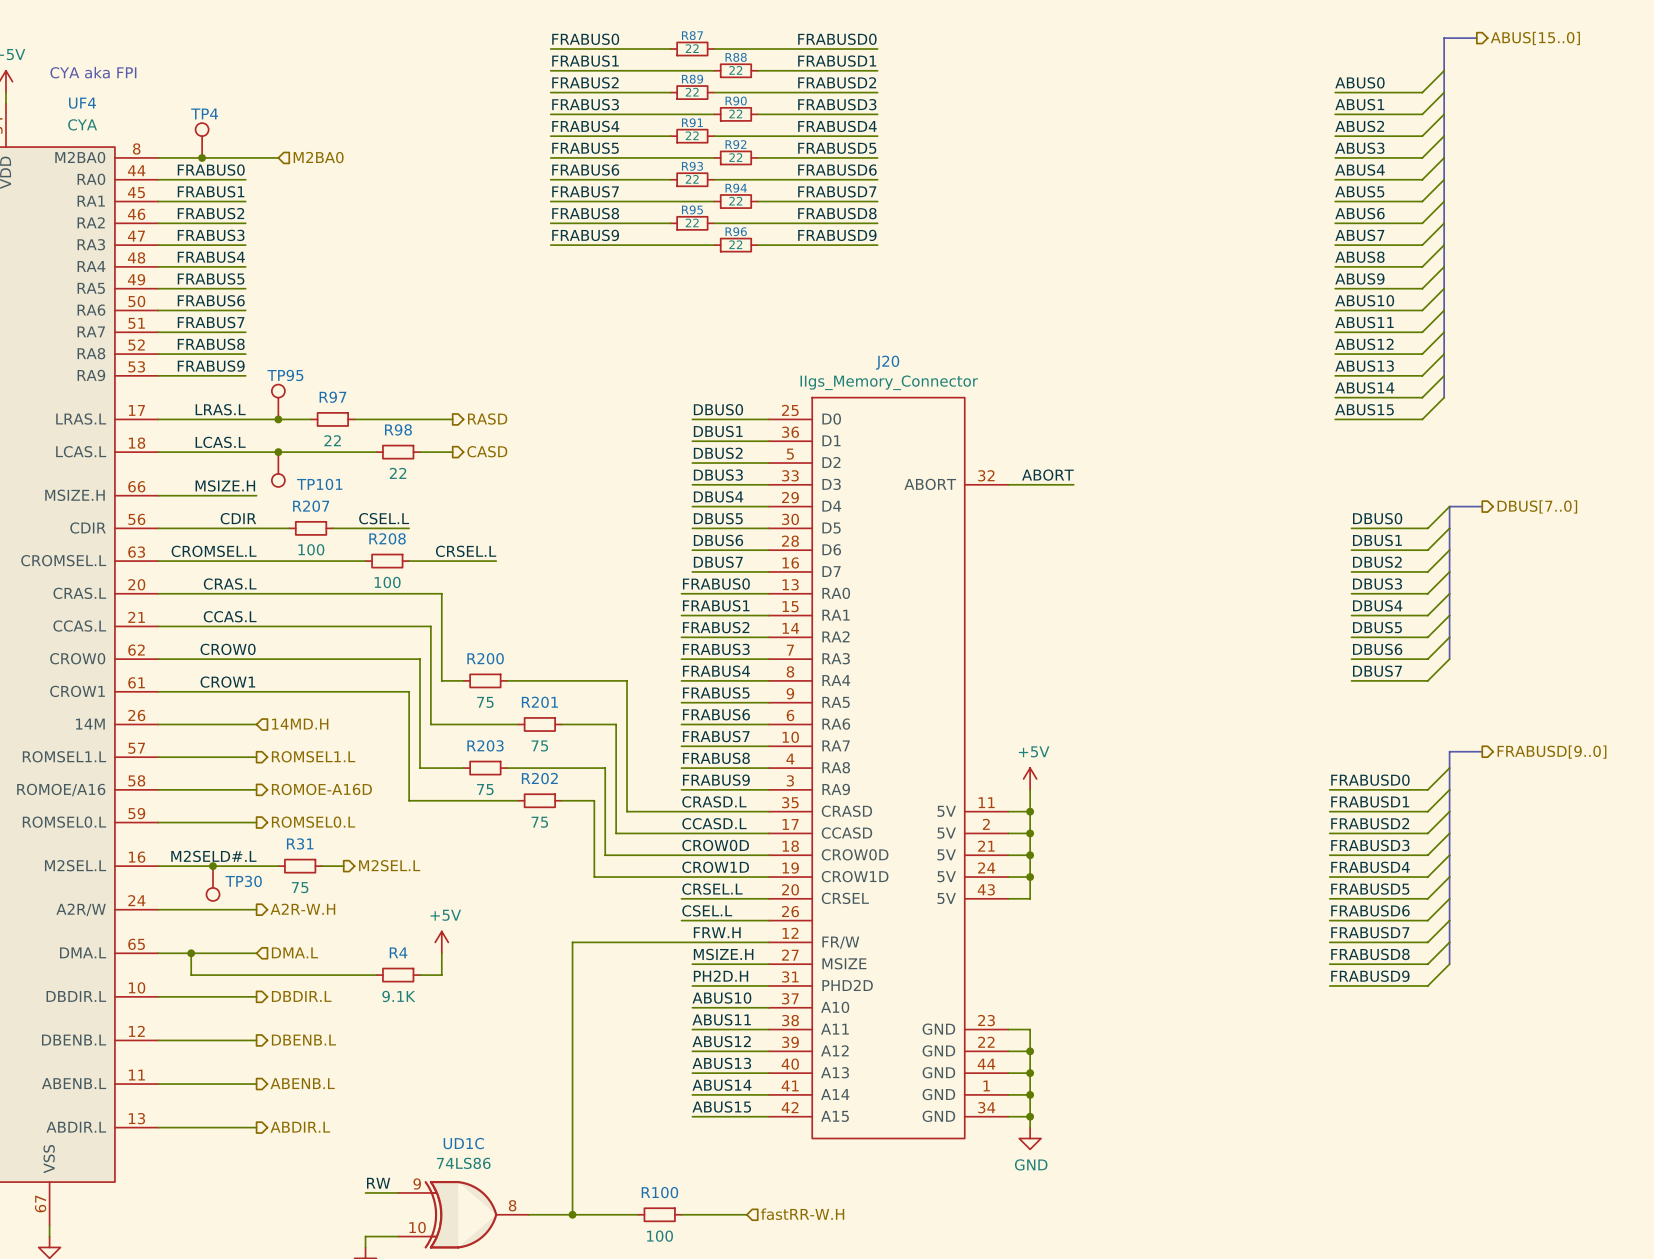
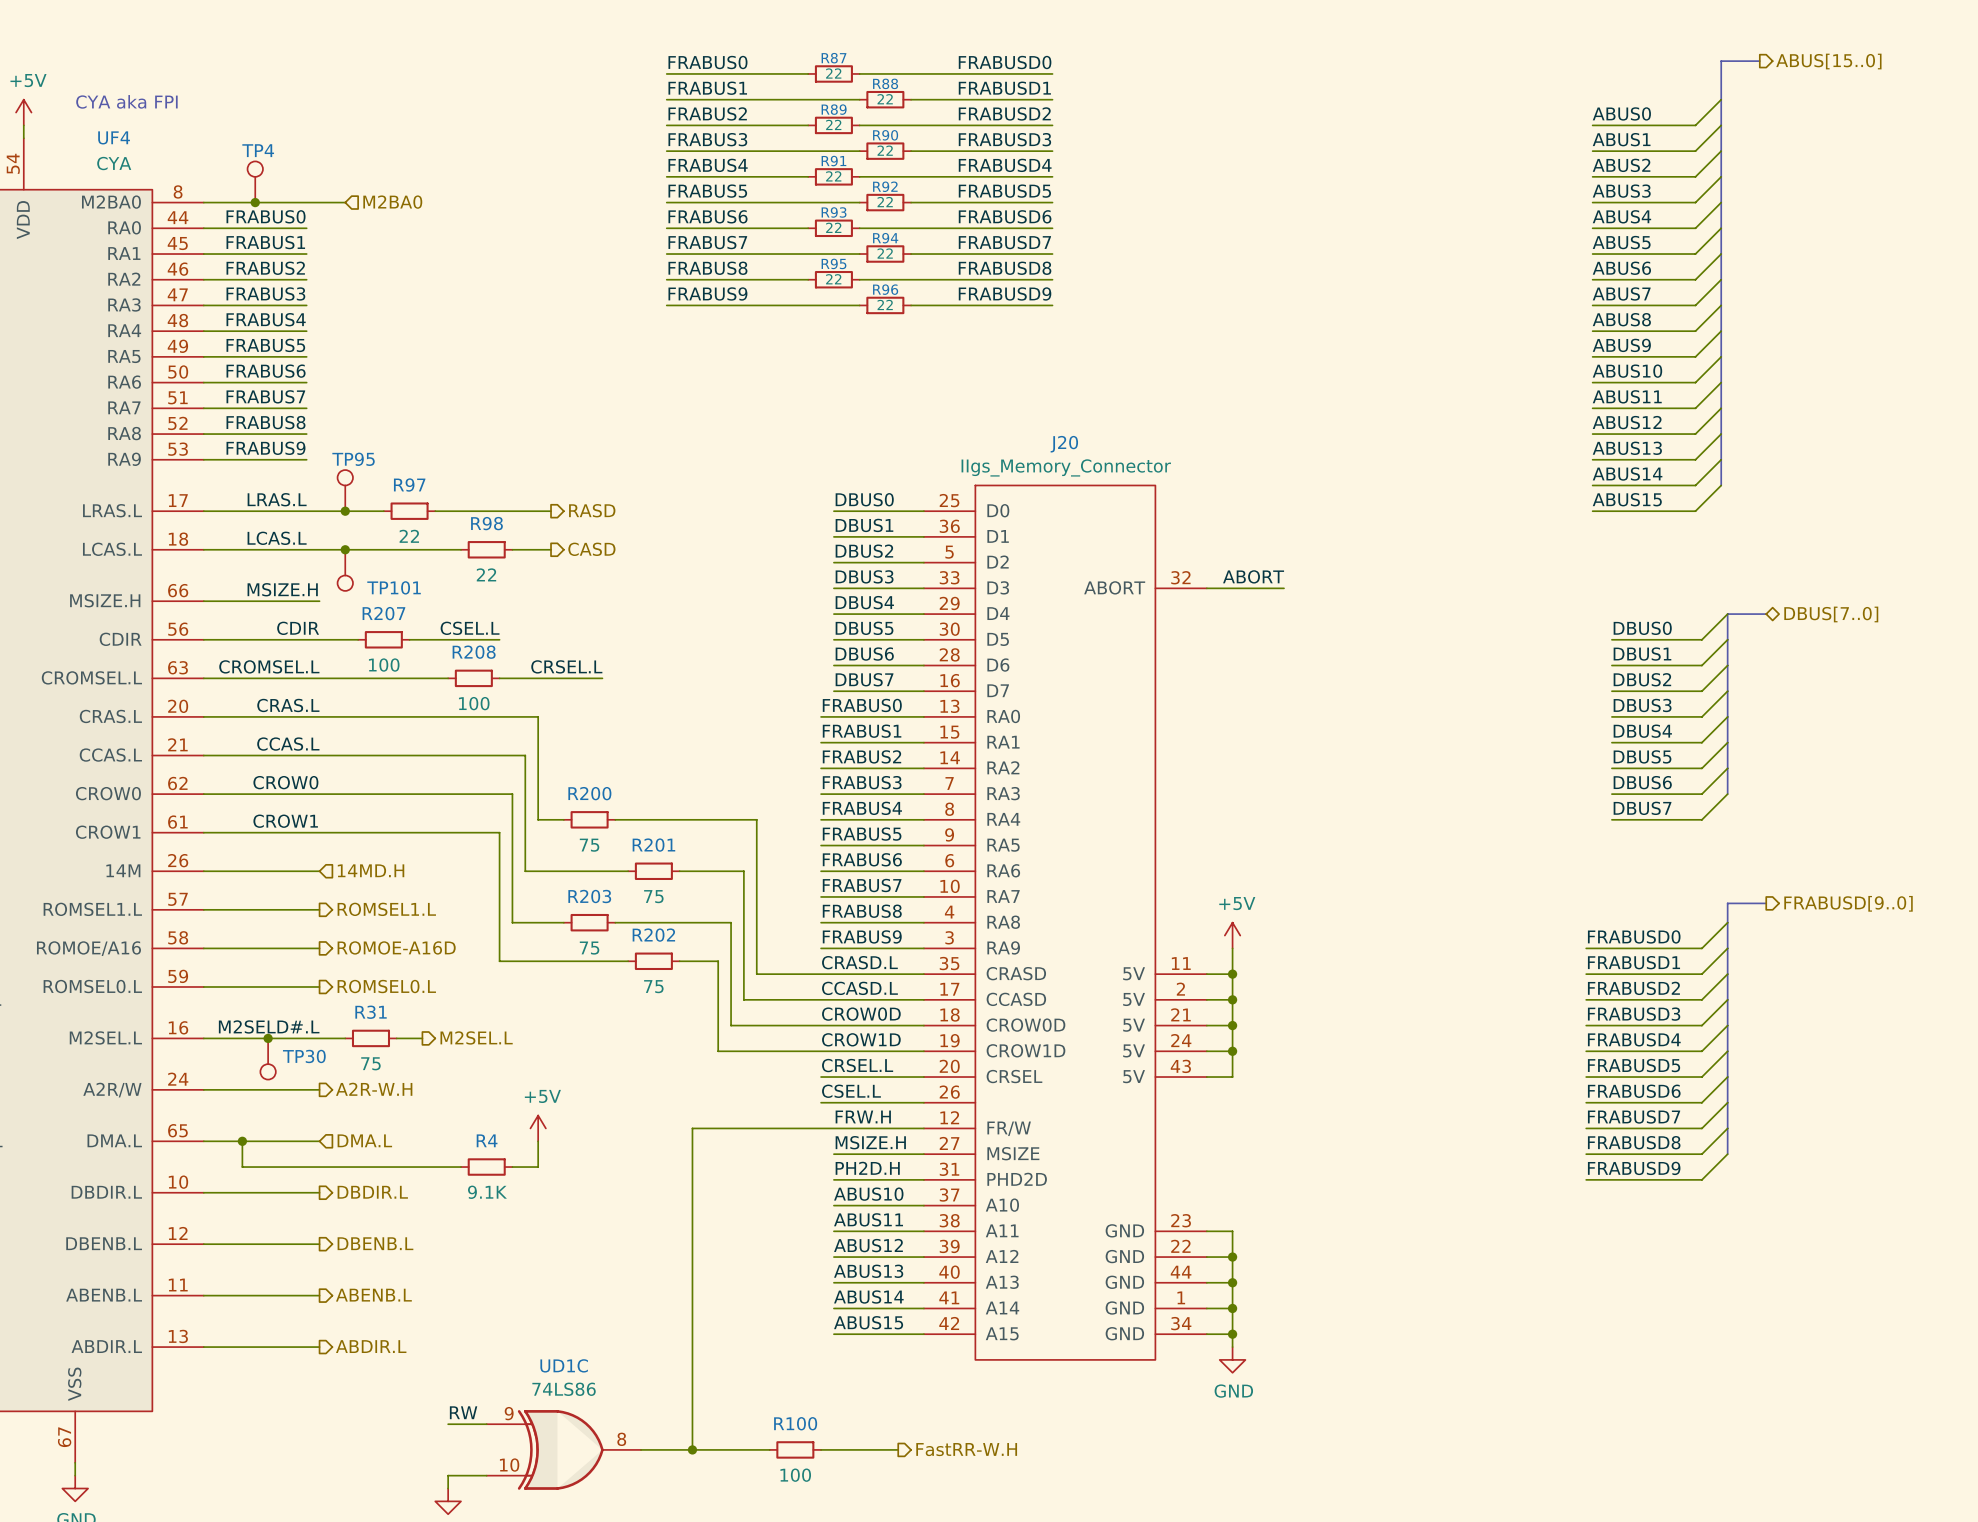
hierarchical label shape: output (1537, 506) -> bidirectional (1831, 614)
hierarchical label shape: input (802, 1214) -> output (966, 1449)
hierarchical label: fastRR-W.H (802, 1214) -> FastRR-W.H (966, 1449)

